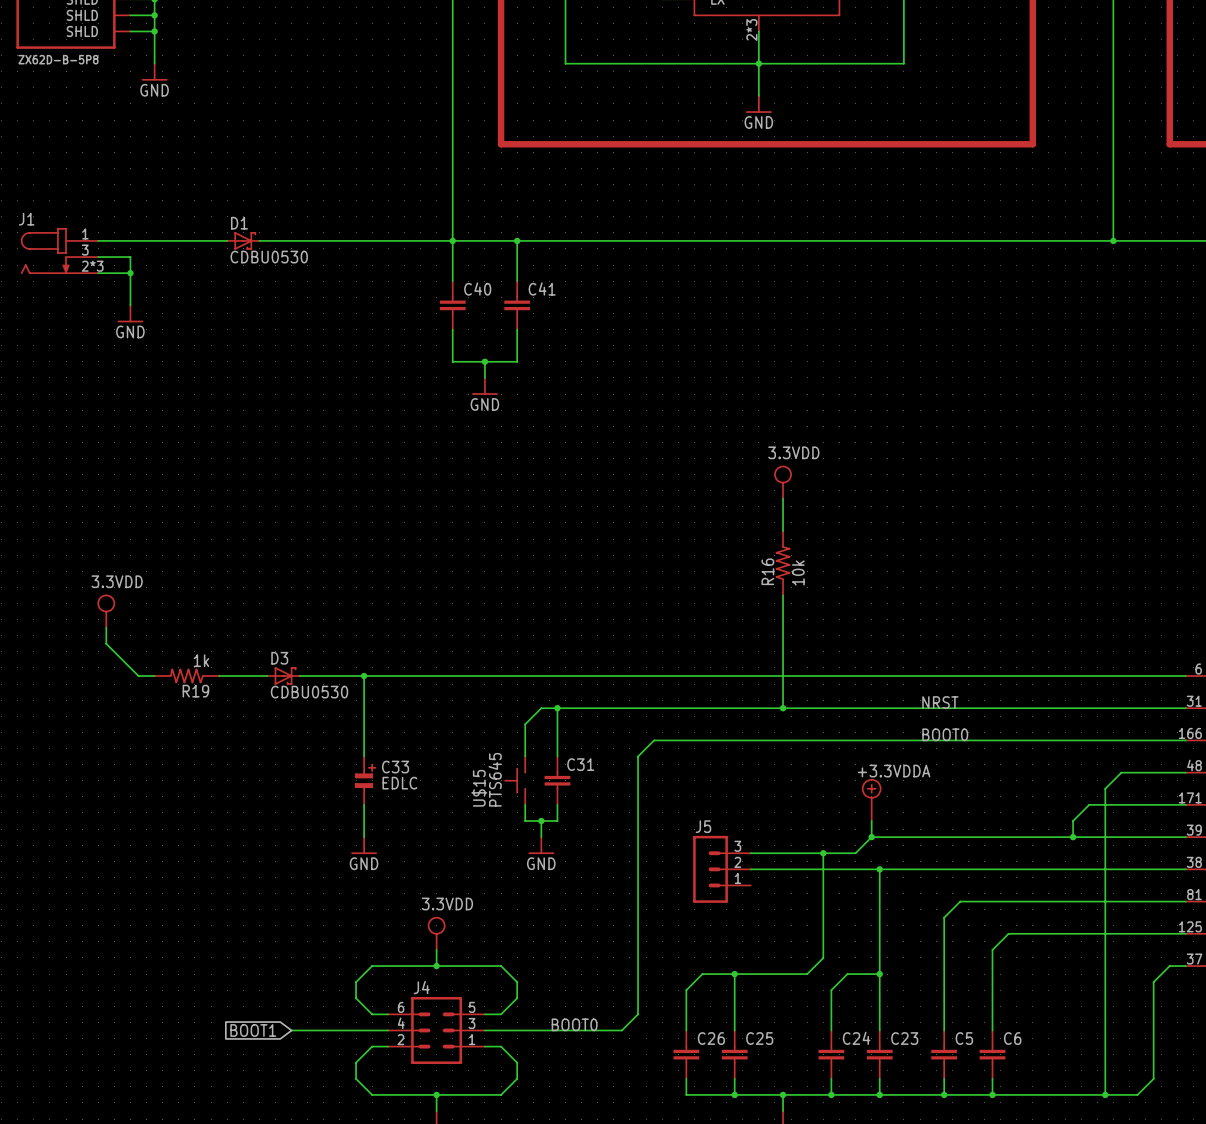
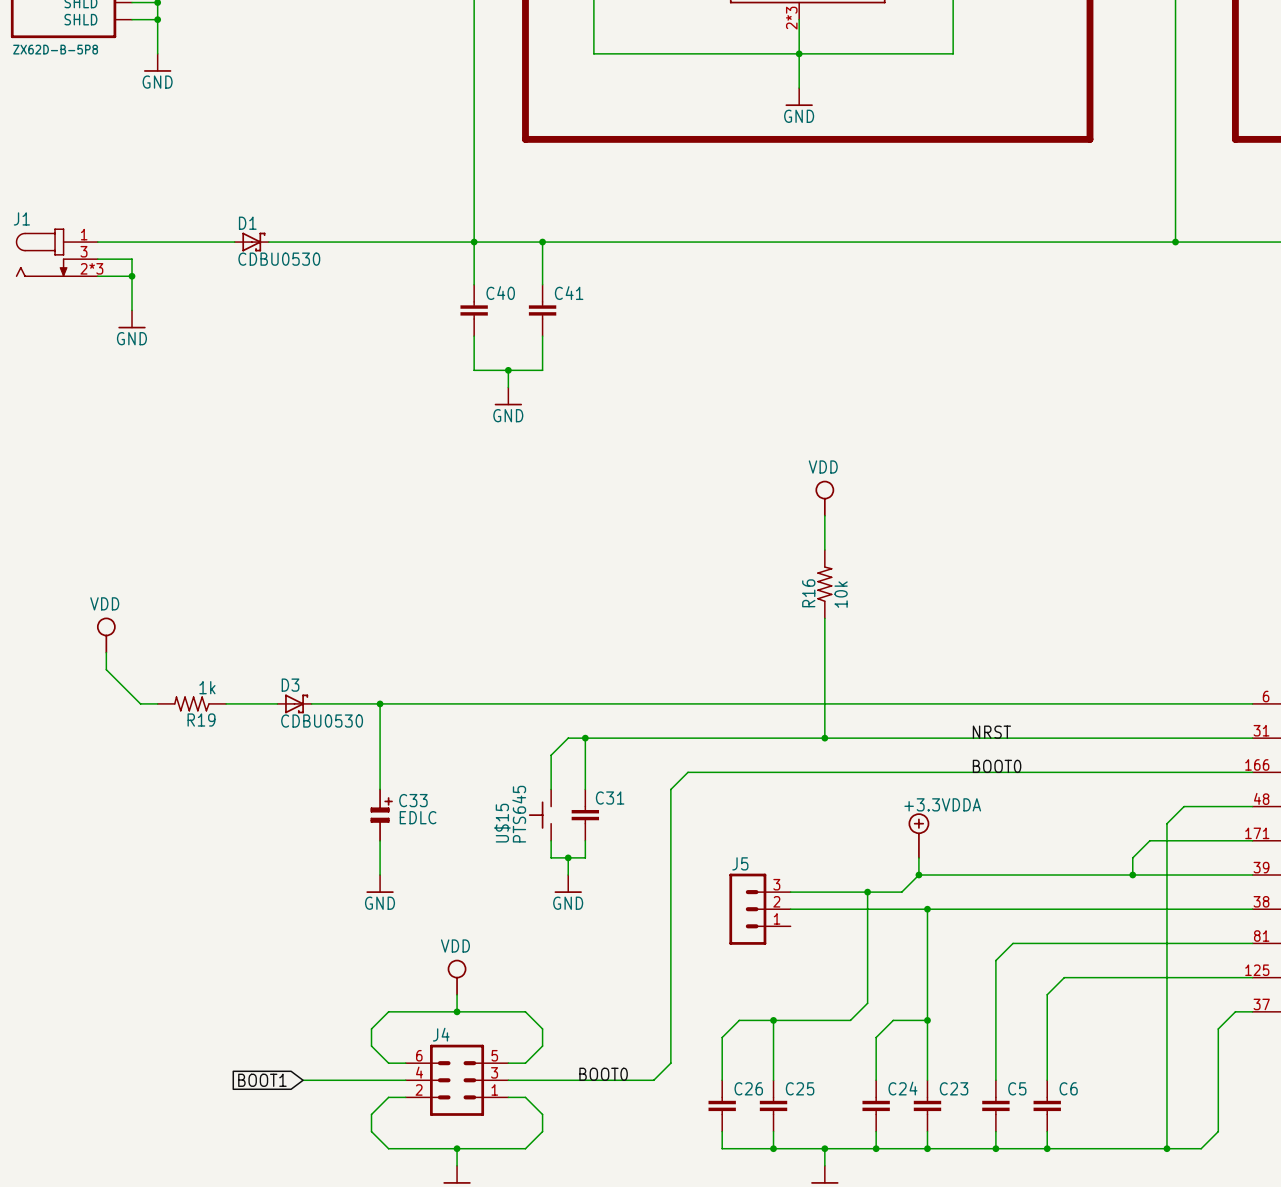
power symbol: 3.3VDD (783, 482) -> VDD (824, 498)
power symbol: 3.3VDD (106, 611) -> VDD (106, 635)
power symbol: 3.3VDD (436, 933) -> VDD (457, 977)

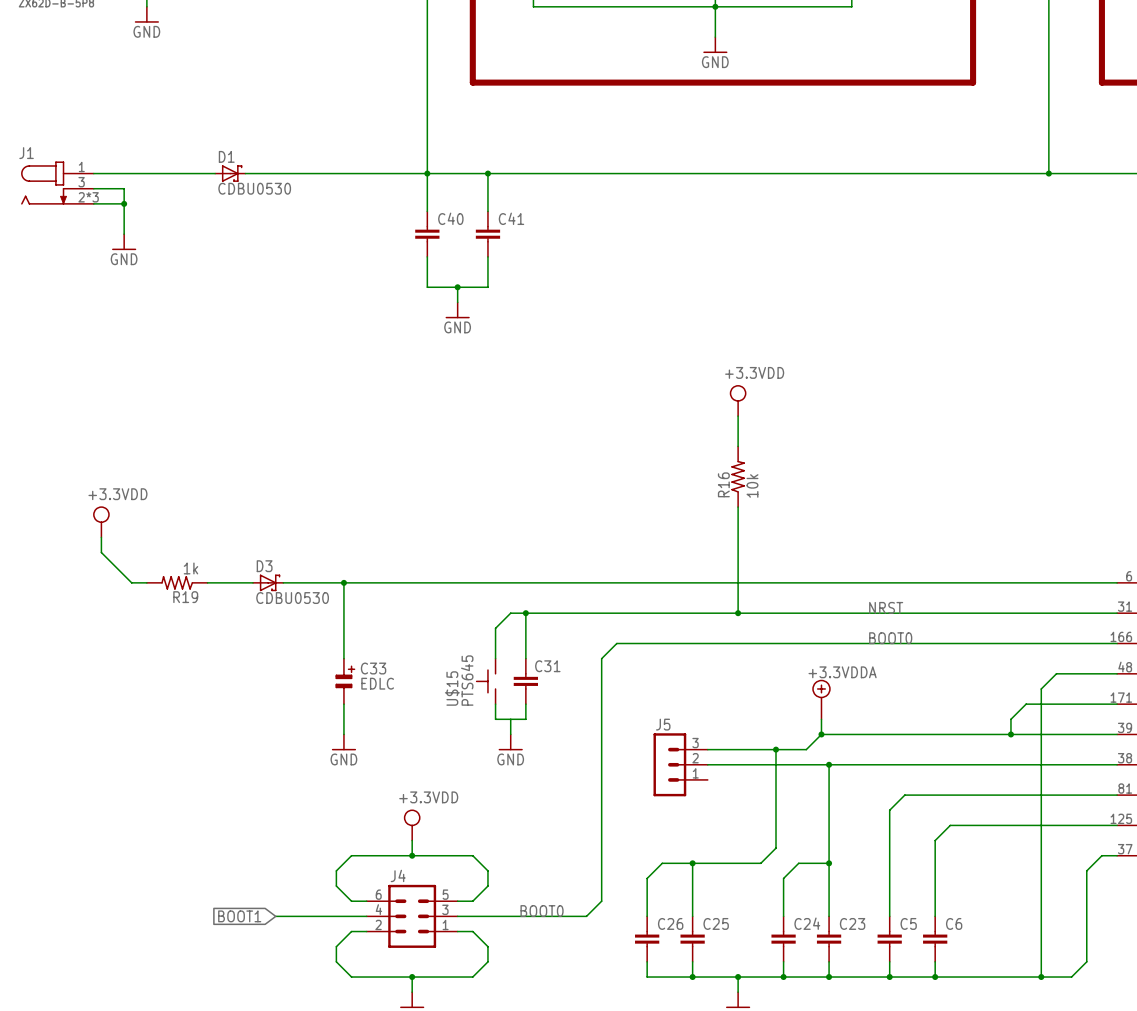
power symbol: VDD (824, 498) -> +3.3VDD (738, 400)
power symbol: VDD (106, 635) -> +3.3VDD (101, 522)
junction: (568, 857) -> none
power symbol: VDD (457, 977) -> +3.3VDD (412, 825)

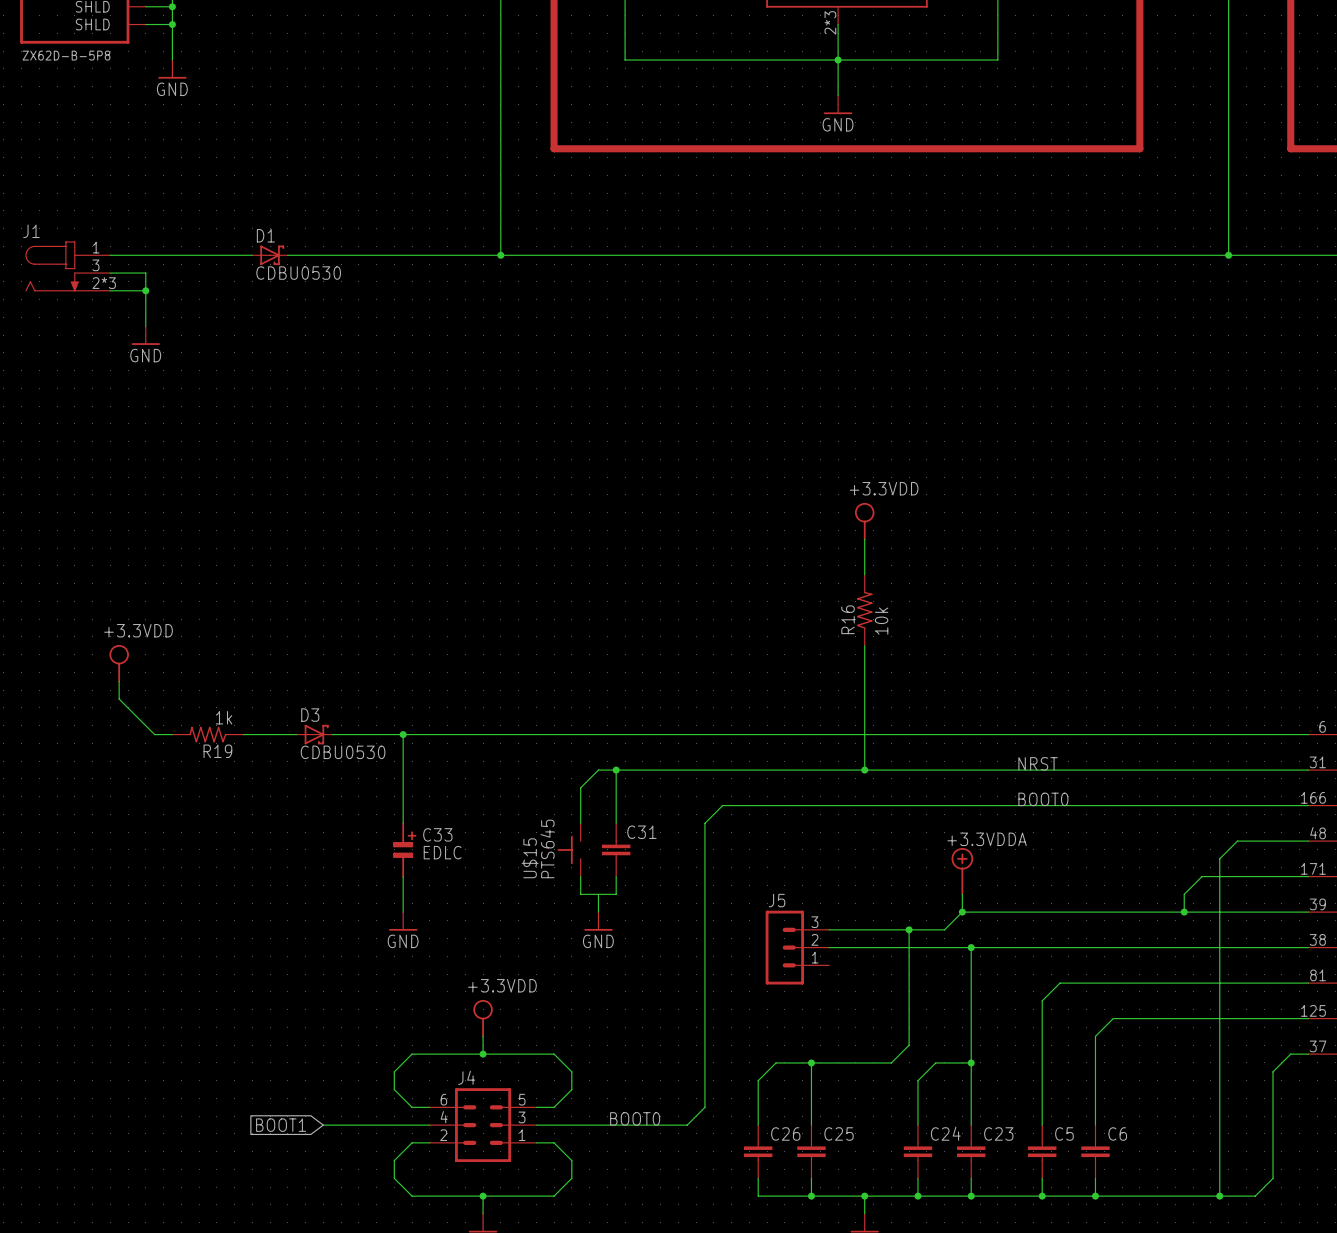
wire: (427, 173) (427, 211) -> none
wire: (487, 173) (487, 211) -> none
junction: (487, 173) -> none
C40: (427, 234) -> none
C41: (487, 234) -> none
wire: (427, 256) (427, 287) (487, 287) (487, 256) -> none
wire: (457, 287) (457, 302) -> none
junction: (457, 287) -> none
power symbol: GND (457, 310) -> none

